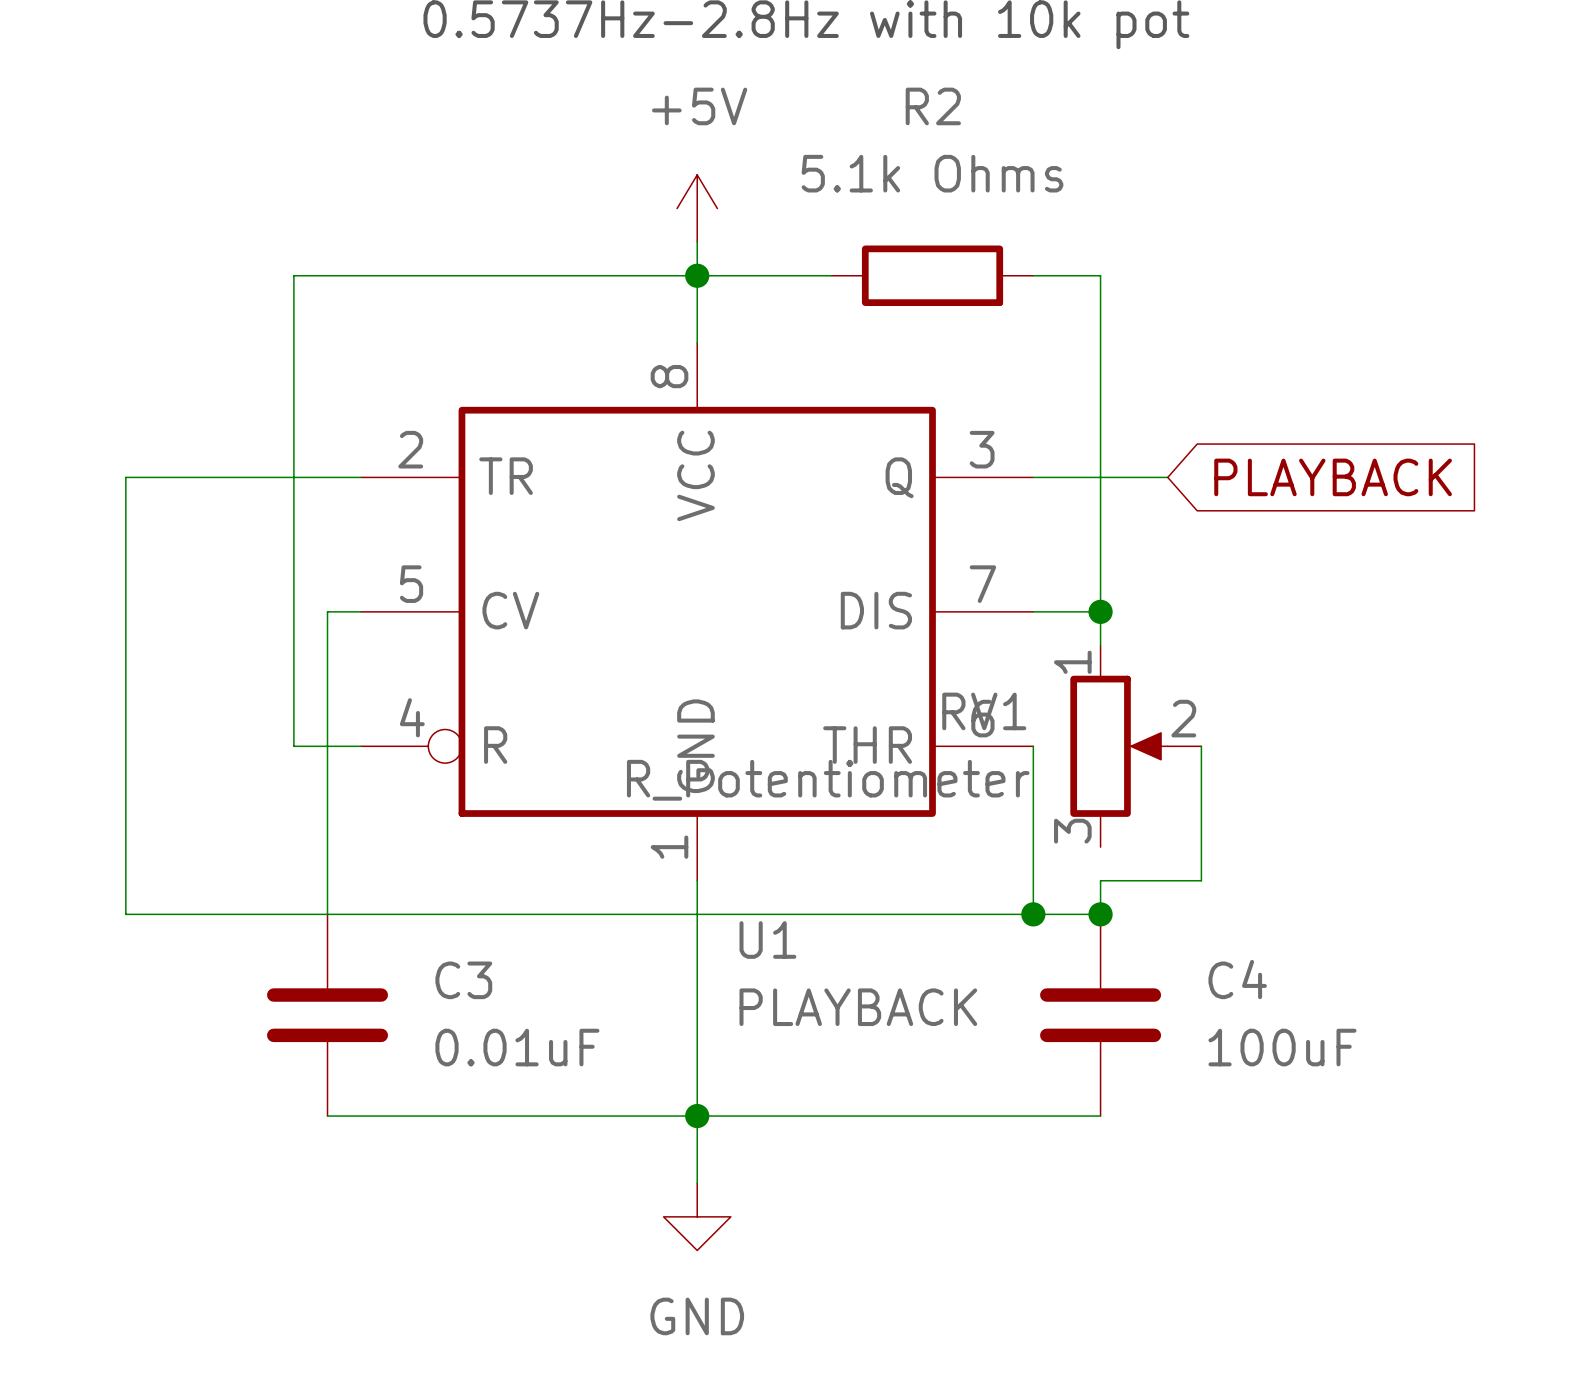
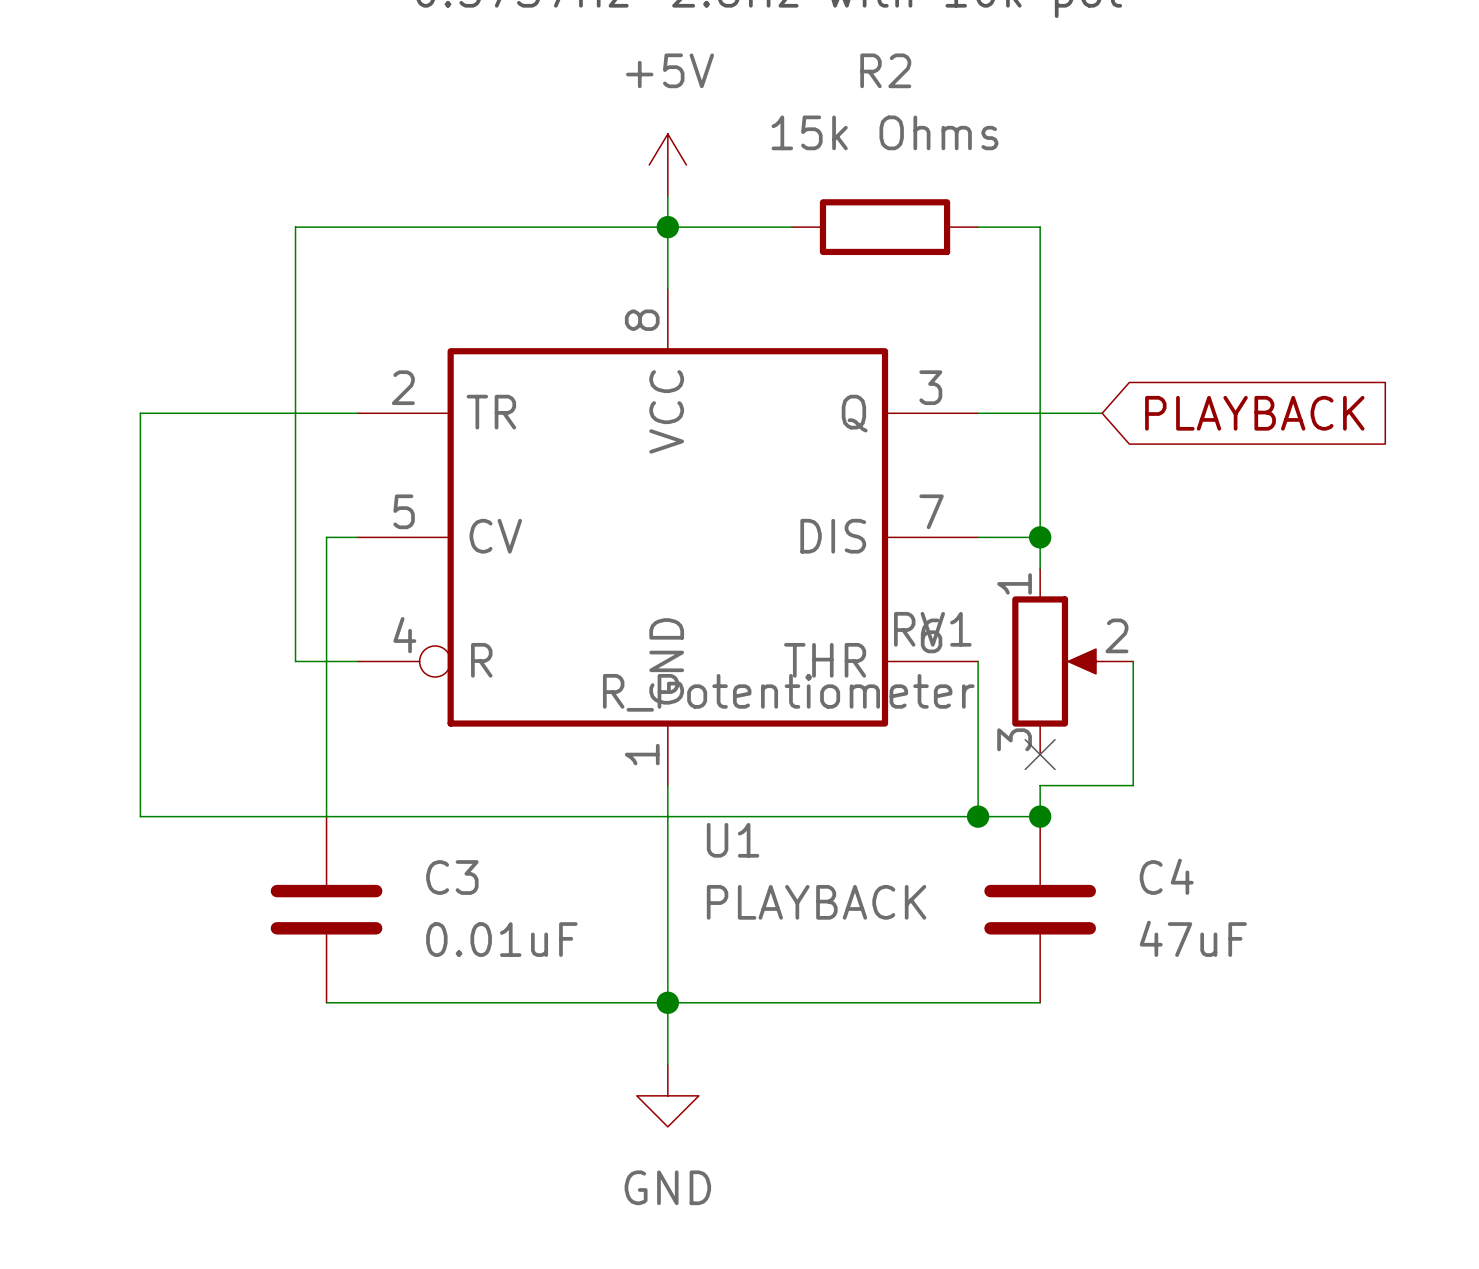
R2 value: 5.1k Ohms (932, 173) -> 15k Ohms (885, 132)
no-connect mark: none -> (1040, 754)
C4 value: 100uF (1282, 1047) -> 47uF (1193, 938)

